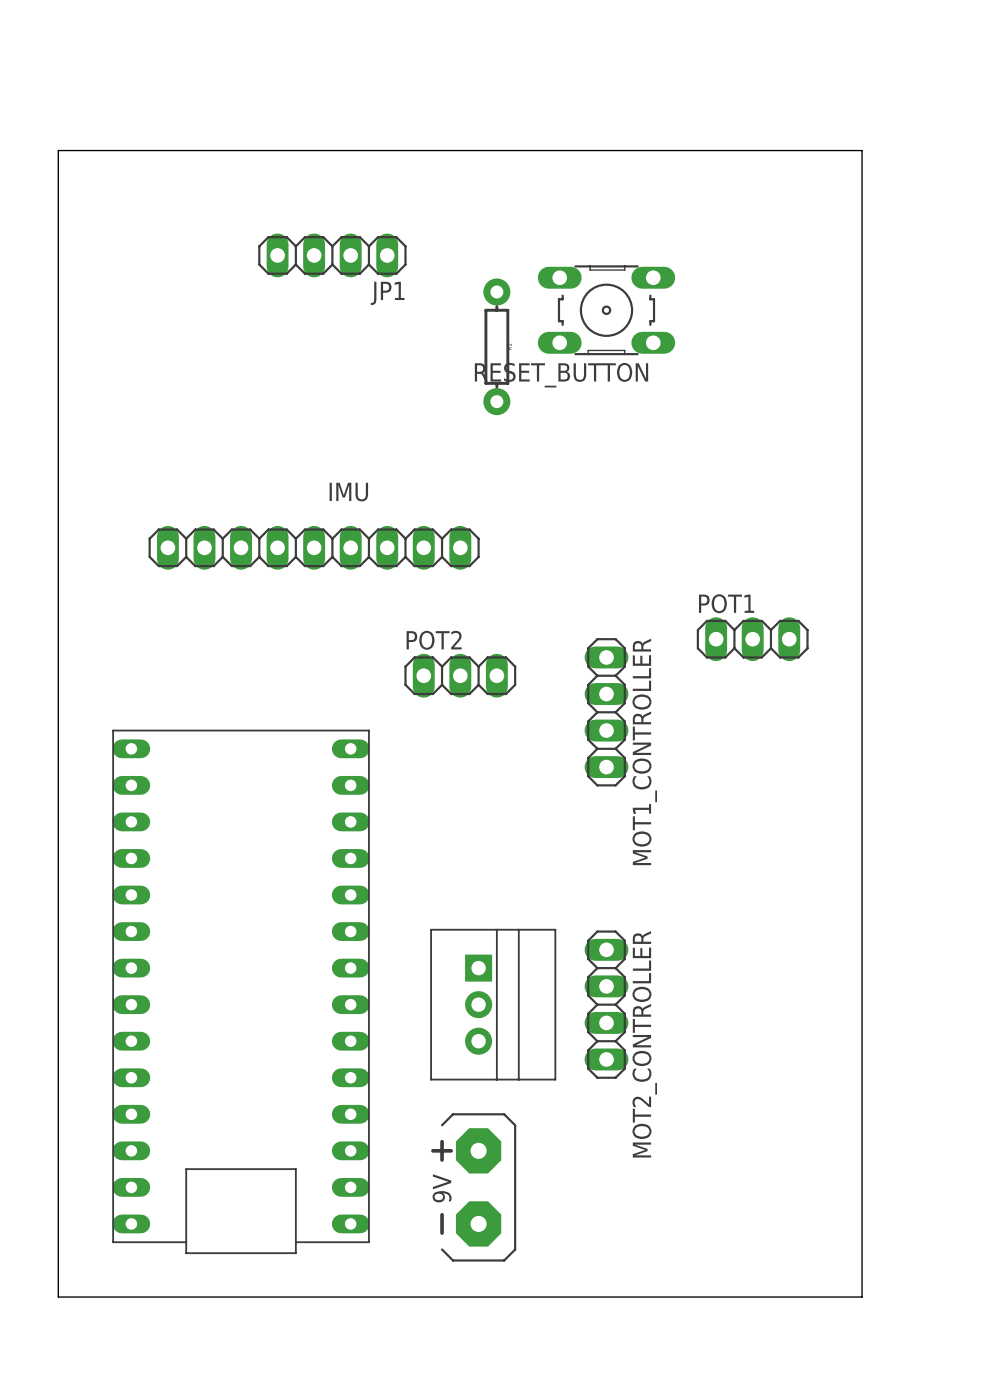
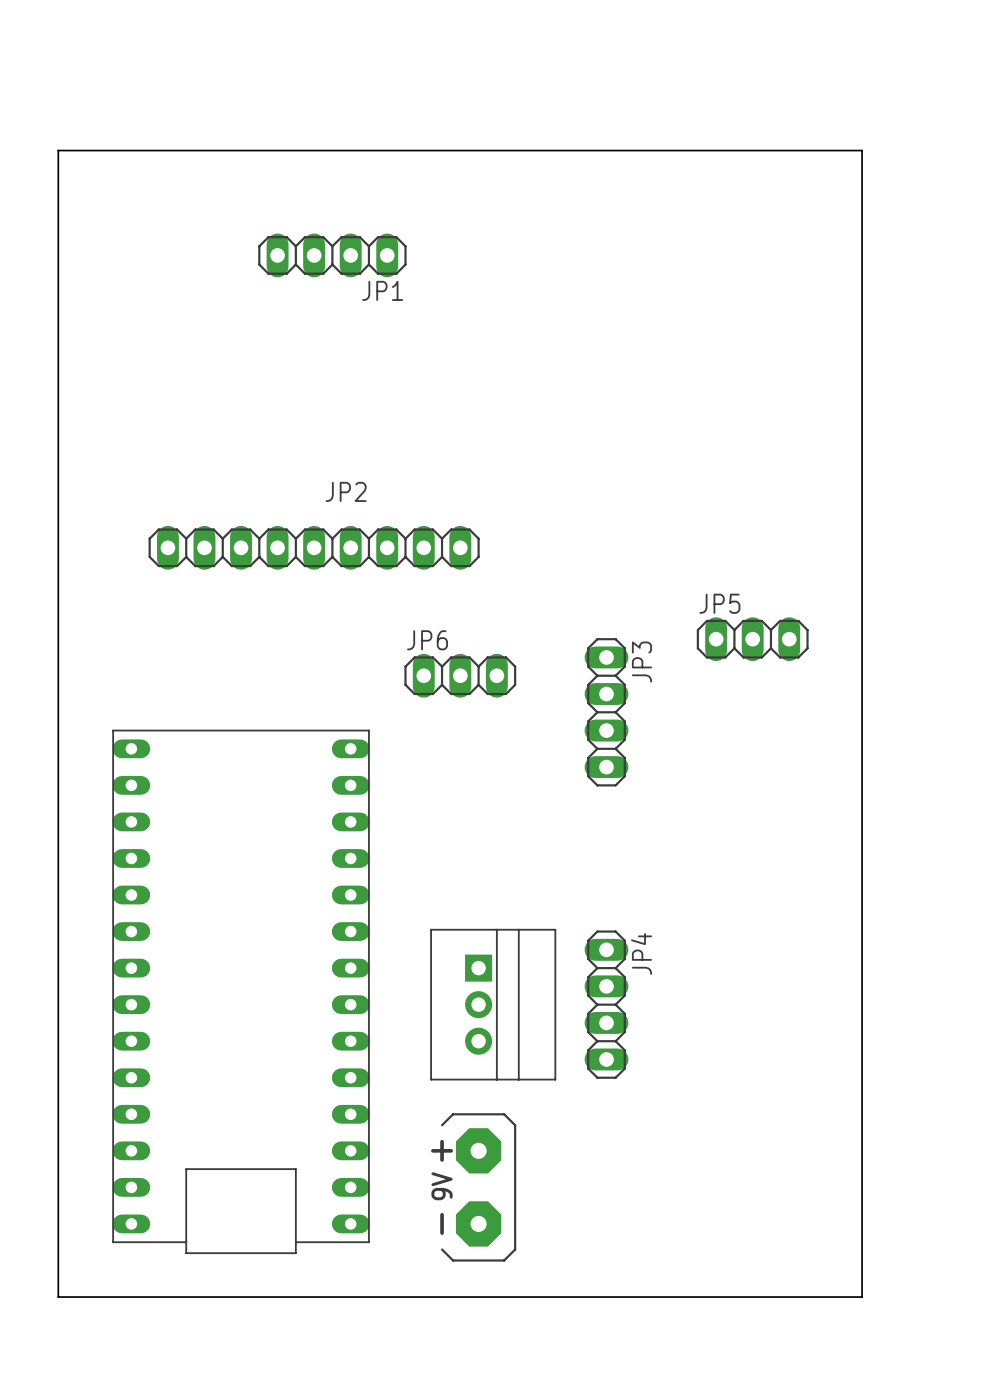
RESET_BUTTON: (606, 310) -> none
part: (496, 346) -> none
IMU name: IMU (348, 492) -> JP2 (346, 491)
POT1 name: POT1 (726, 603) -> JP5 (719, 603)
POT2 name: POT2 (434, 640) -> JP6 (427, 640)
MOT1_CONTROLLER name: MOT1_CONTROLLER (644, 751) -> JP3 (641, 662)
MOT2_CONTROLLER name: MOT2_CONTROLLER (644, 1044) -> JP4 (641, 953)

